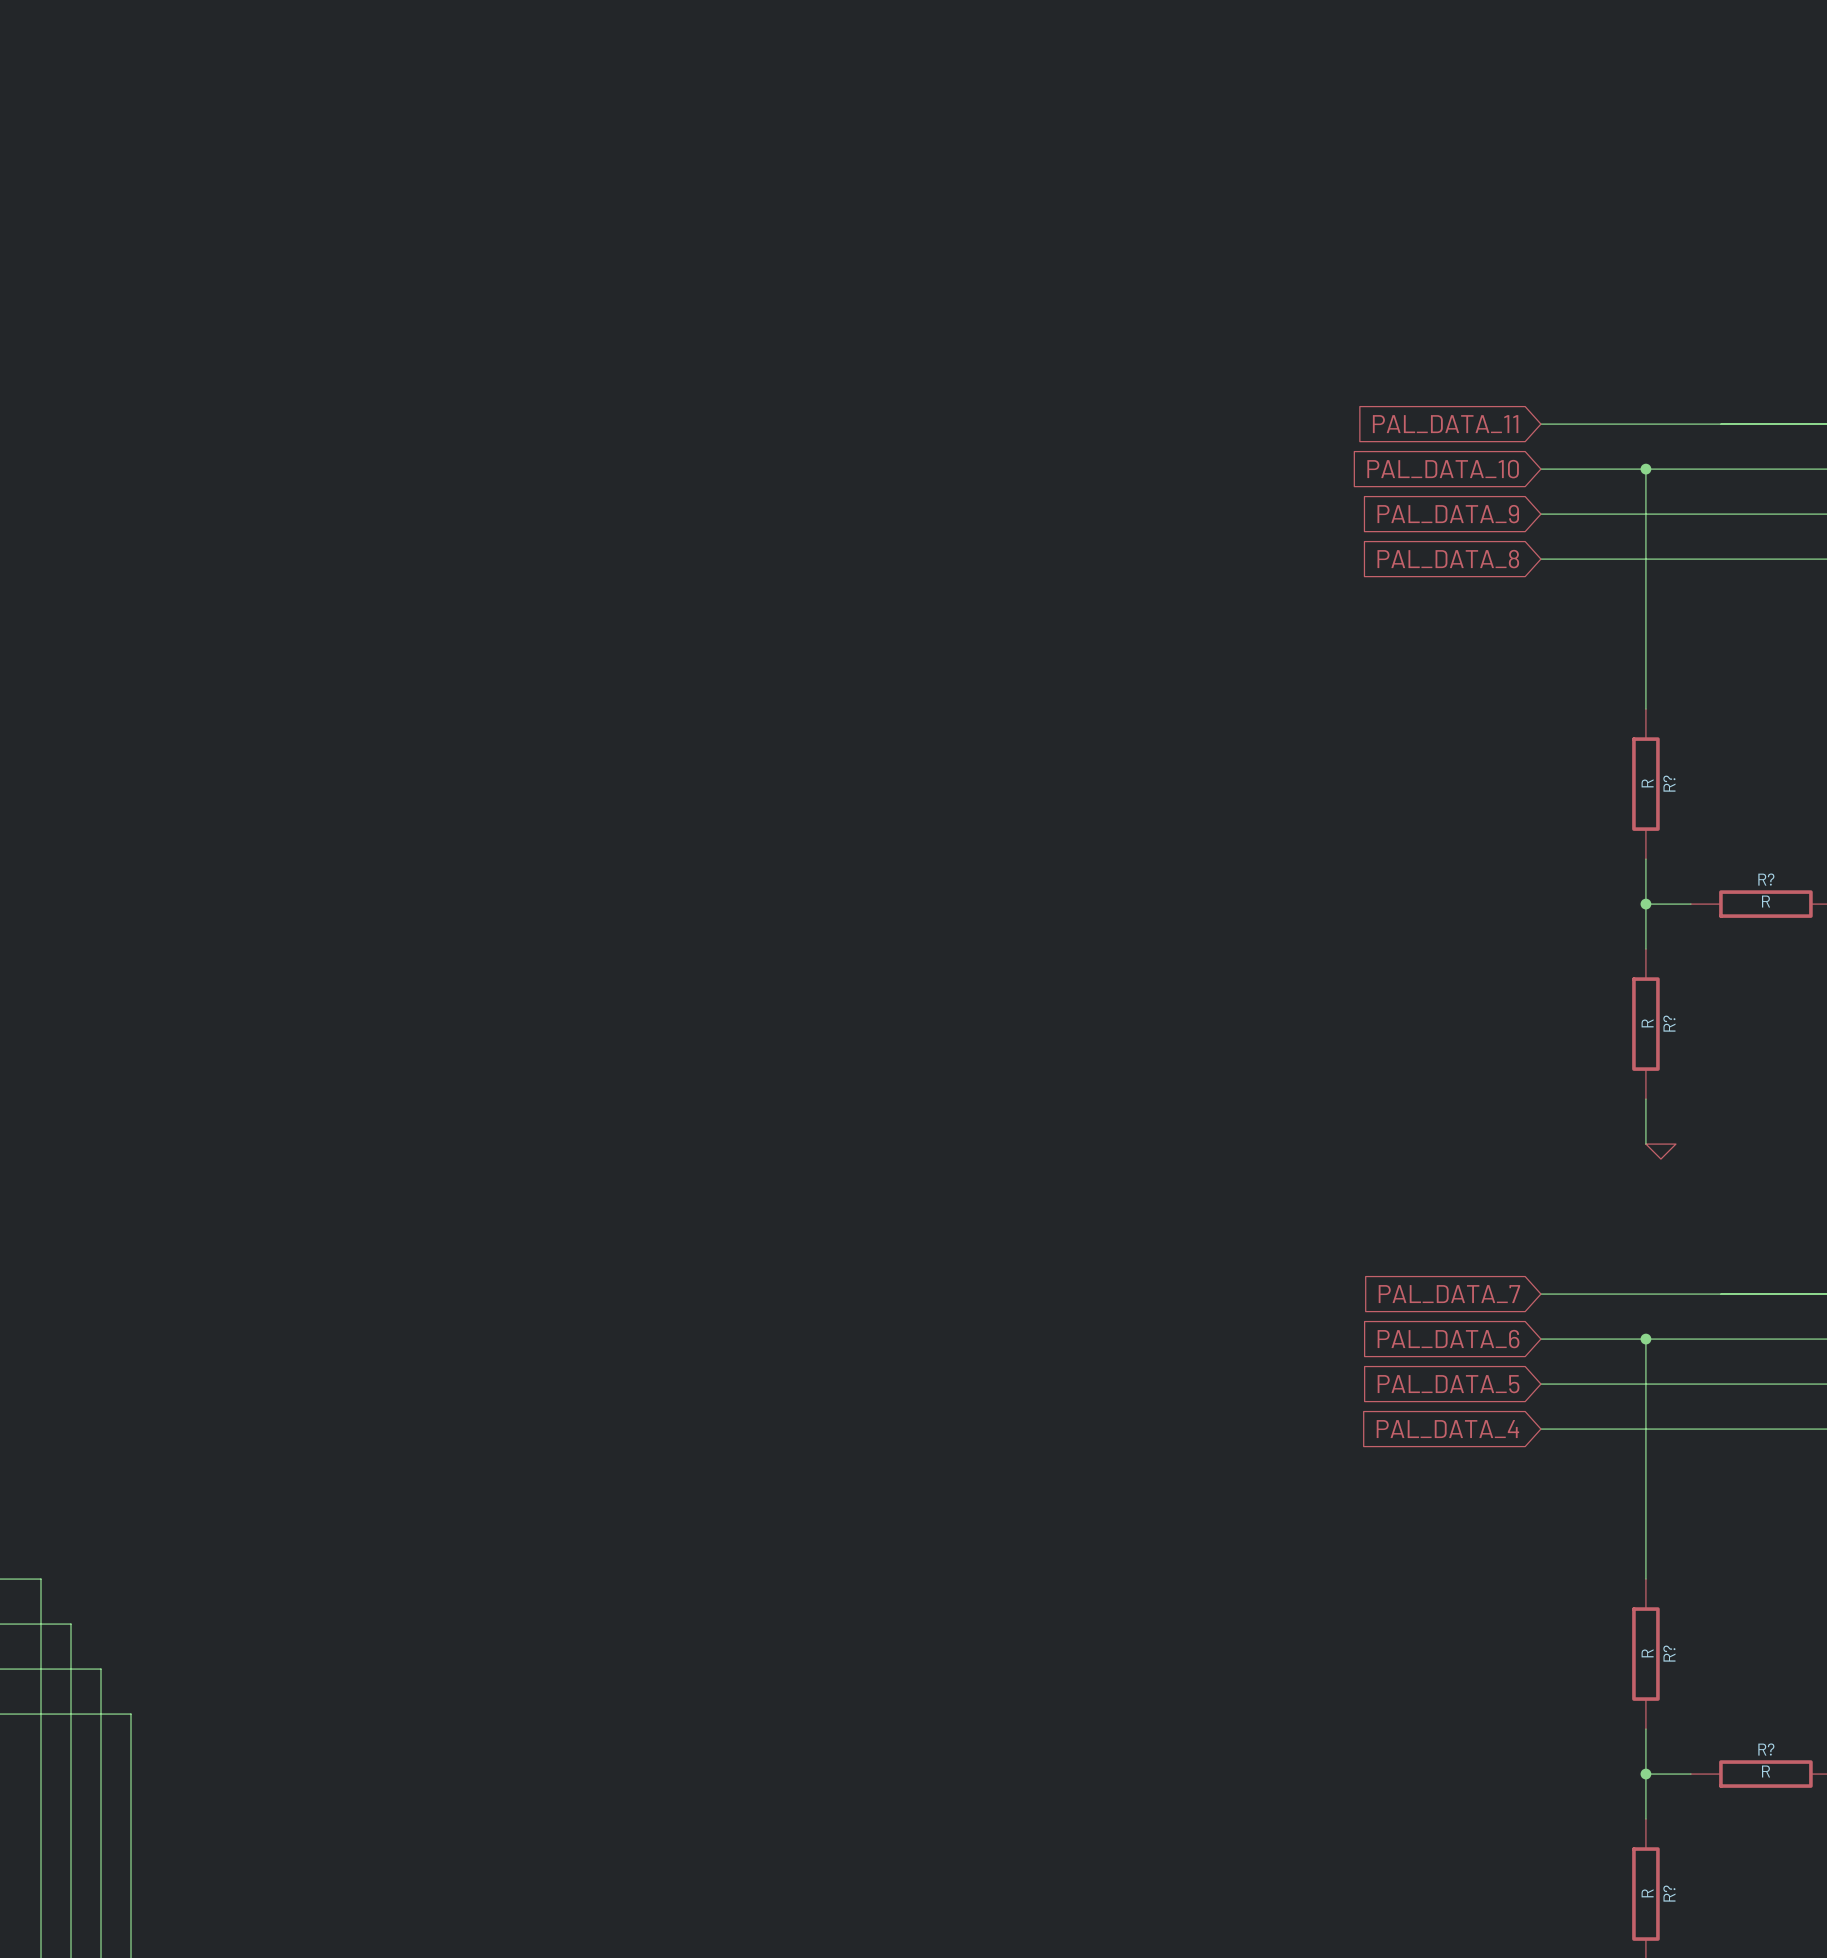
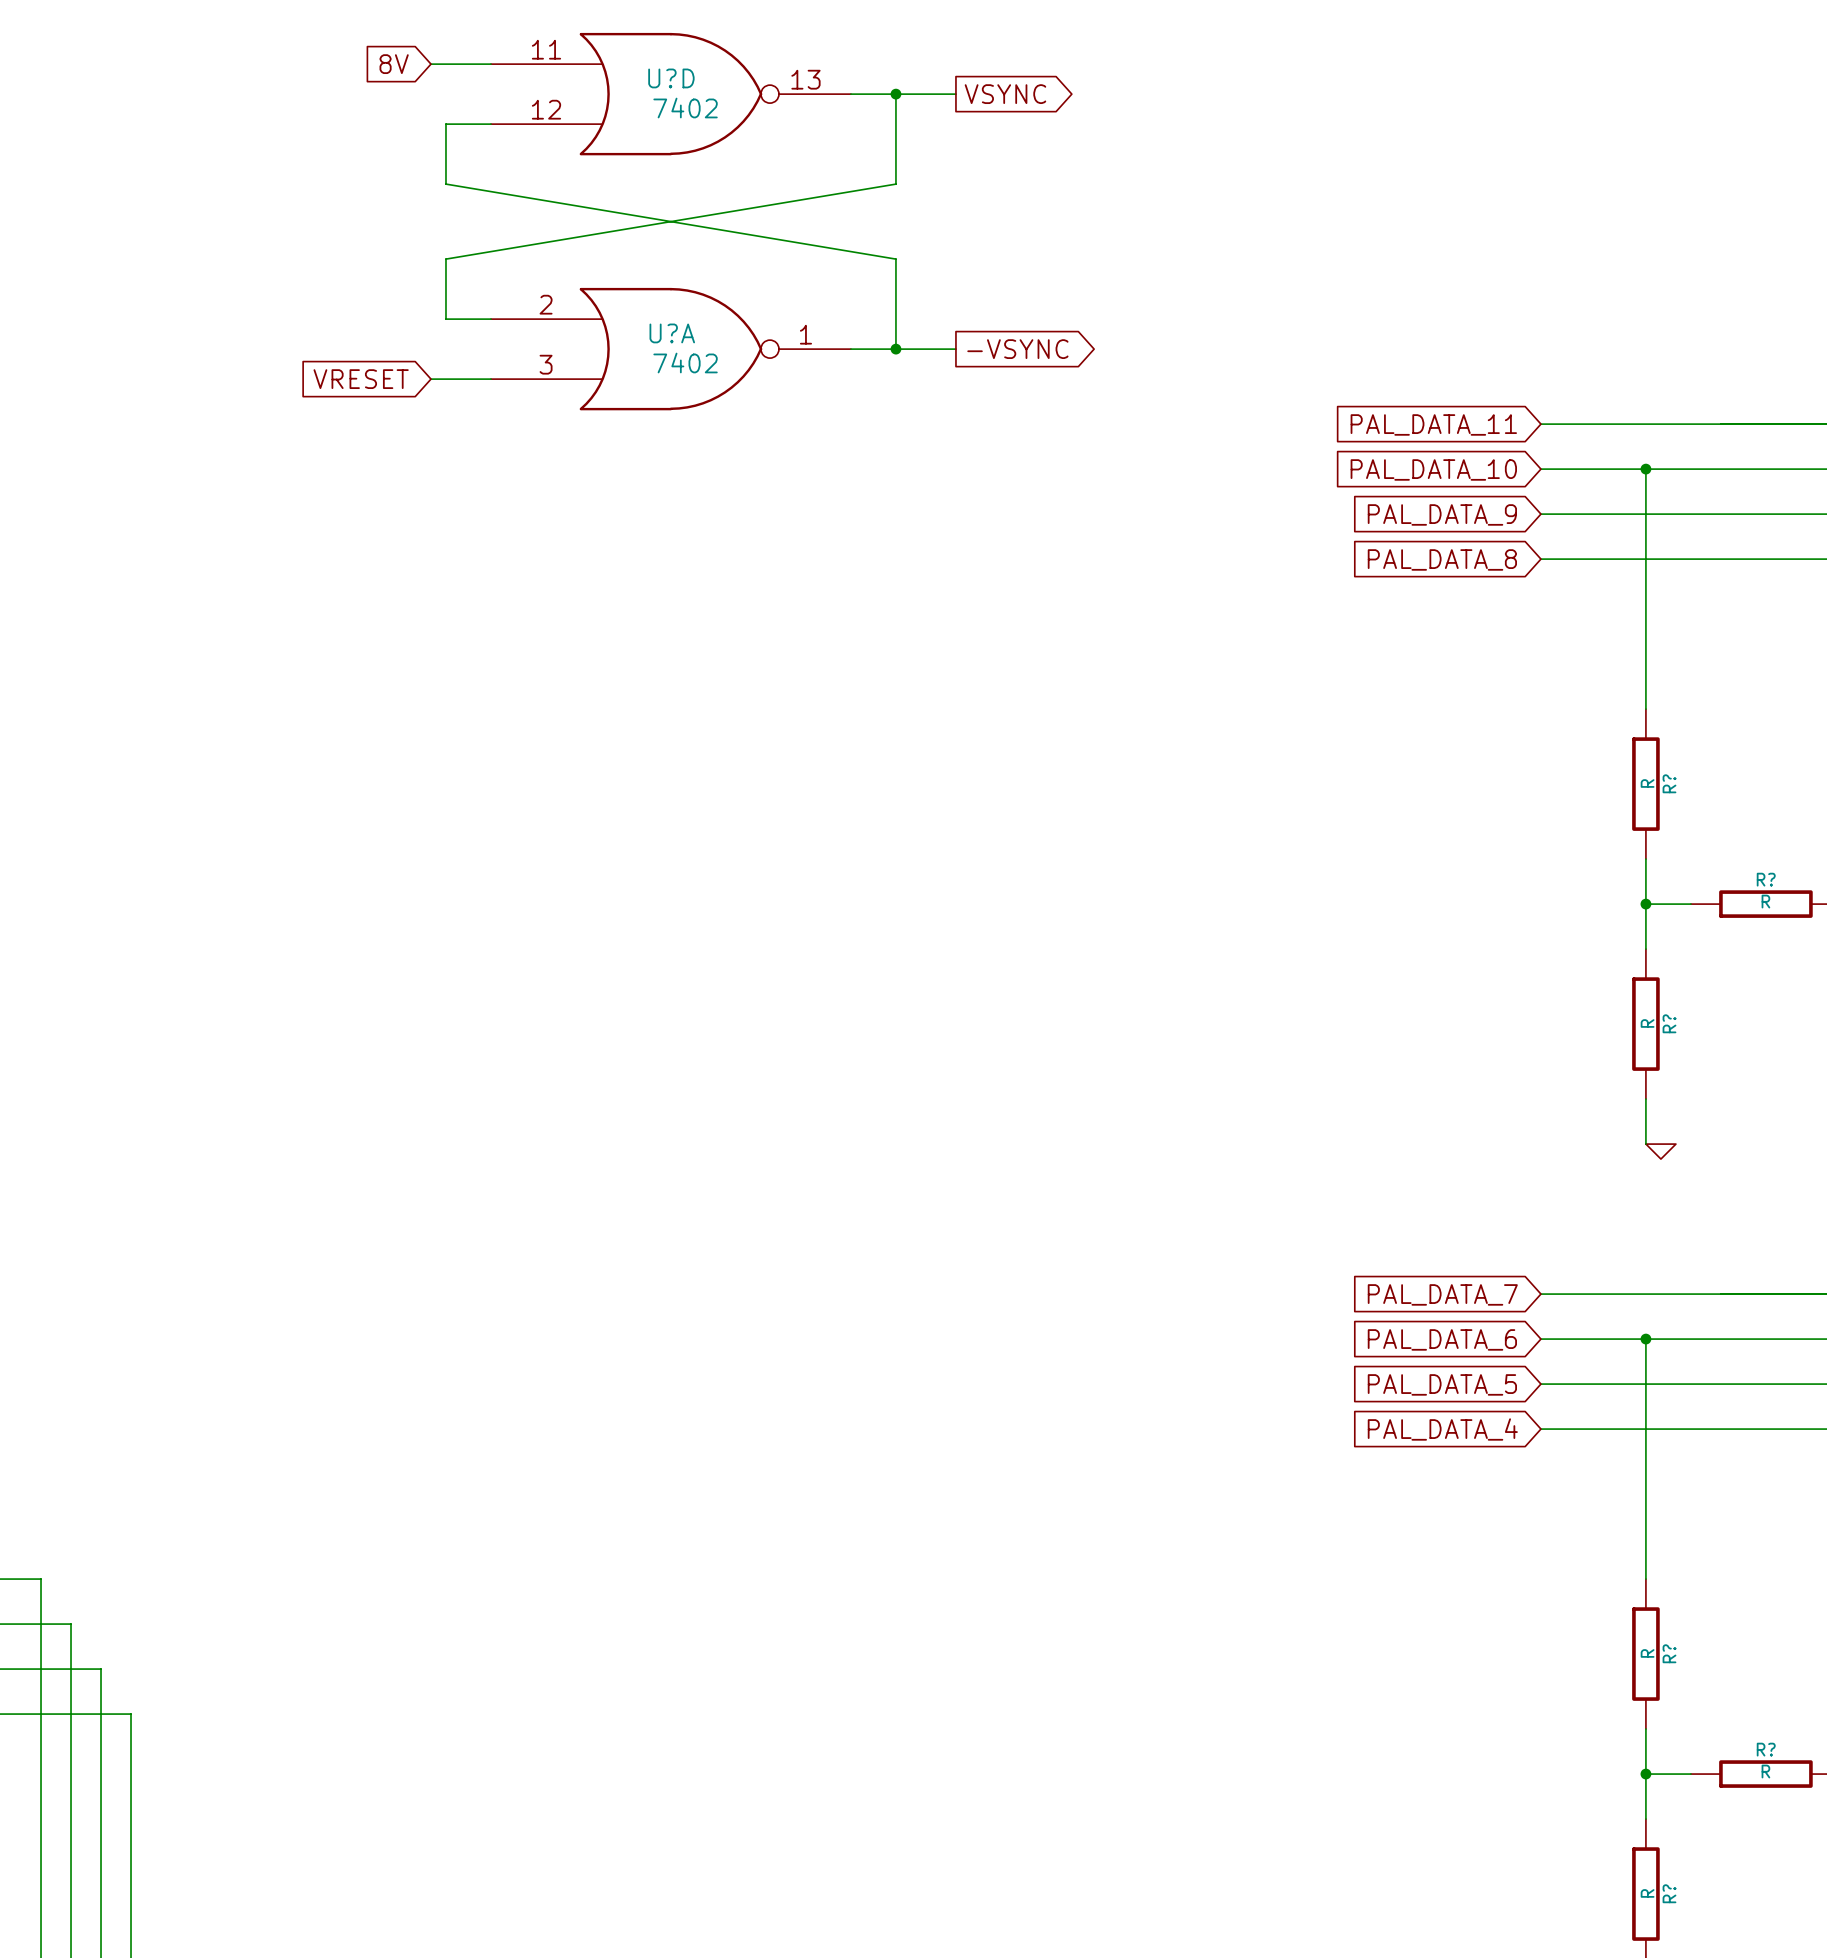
global label: none -> 8V (394, 64)
wire: none -> (430, 64) (490, 64)
U?D: none -> 7402 (670, 94)
wire: none -> (850, 94) (955, 94)
wire: none -> (895, 94) (895, 184) (445, 259) (445, 319) (490, 319)
junction: none -> (895, 94)
global label: none -> VSYNC (1005, 94)
wire: none -> (490, 124) (445, 124) (445, 184) (895, 259) (895, 349)
U?A: none -> 7402 (670, 349)
wire: none -> (850, 349) (955, 349)
junction: none -> (895, 349)
global label: none -> -VSYNC (1017, 349)
global label: none -> VRESET (361, 379)
wire: none -> (430, 379) (490, 379)

